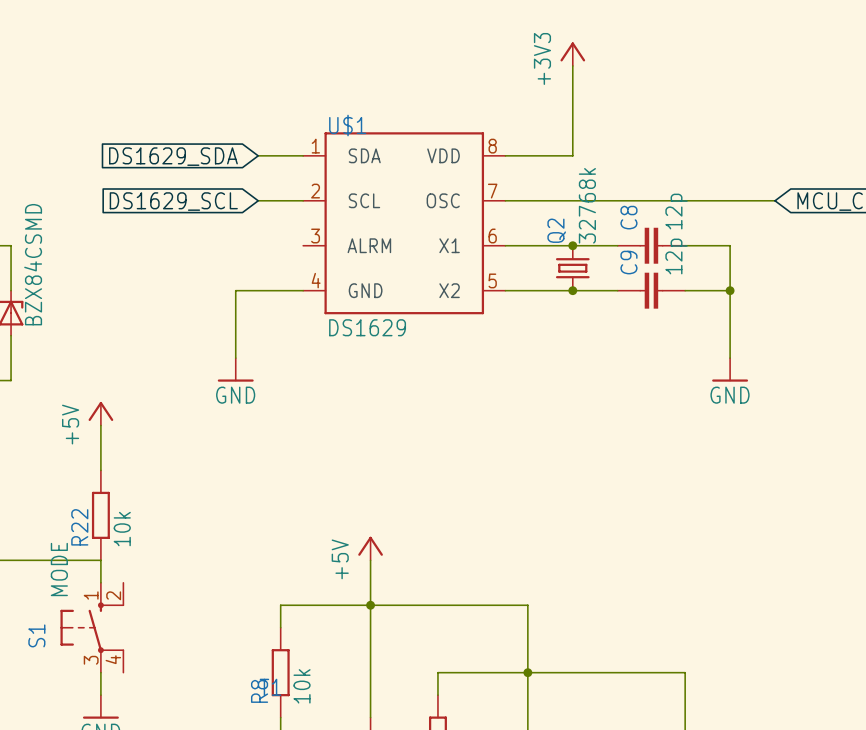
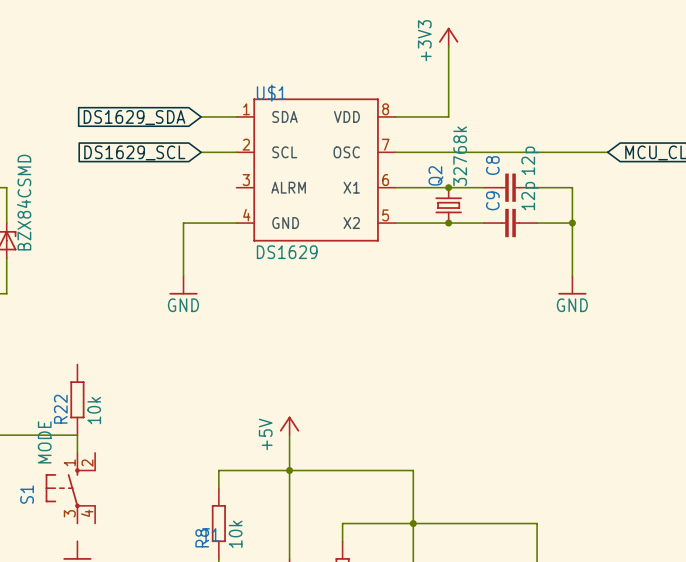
power symbol: +5V (100, 413) -> none
wire: (100, 425) (100, 470) -> none
wire: (100, 672) (100, 695) -> none

